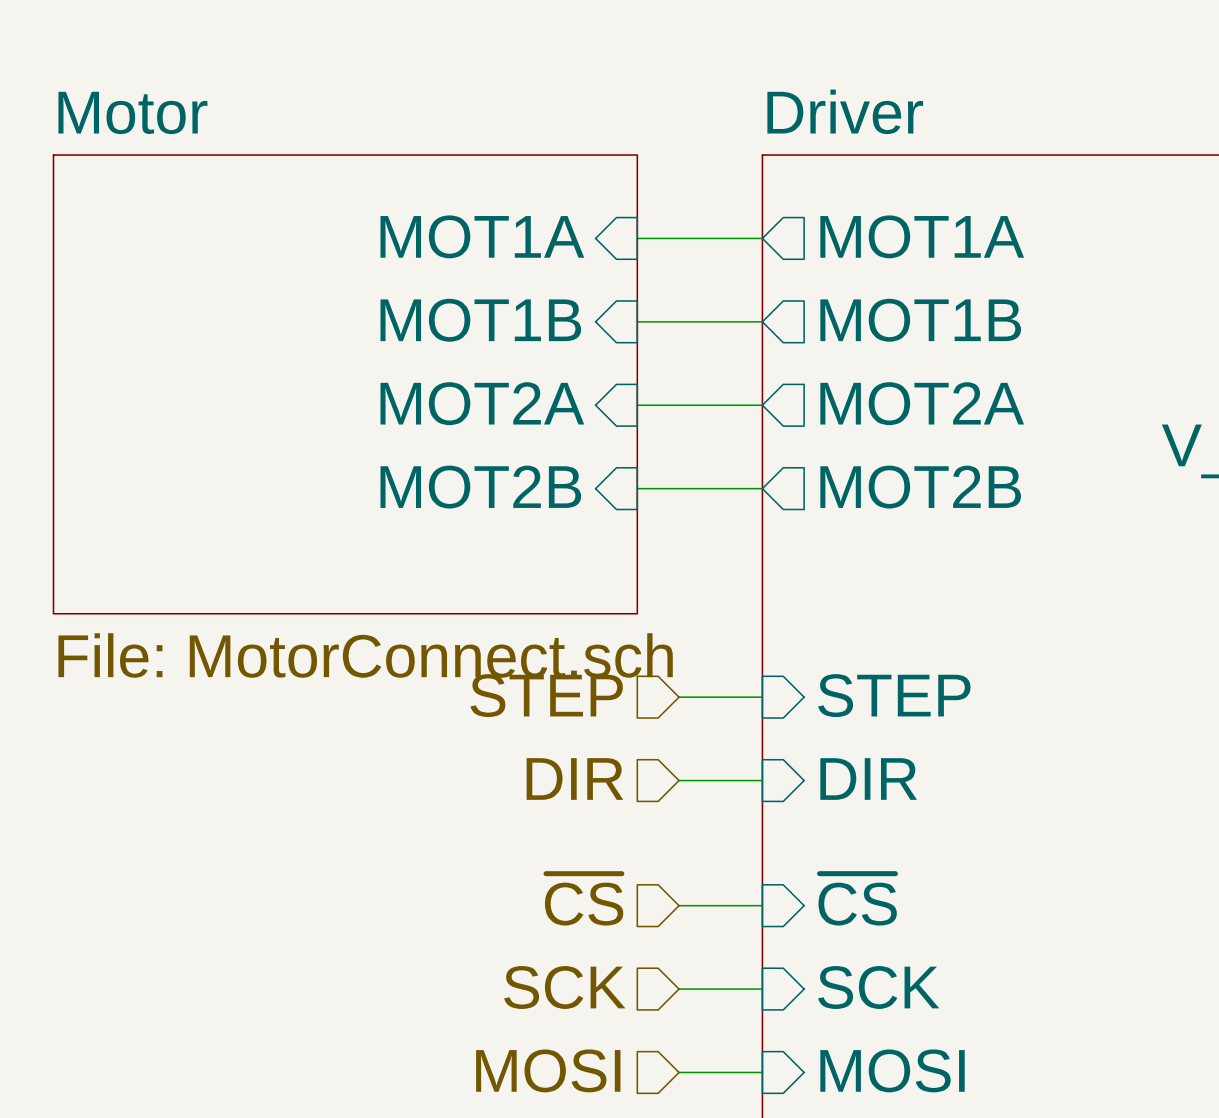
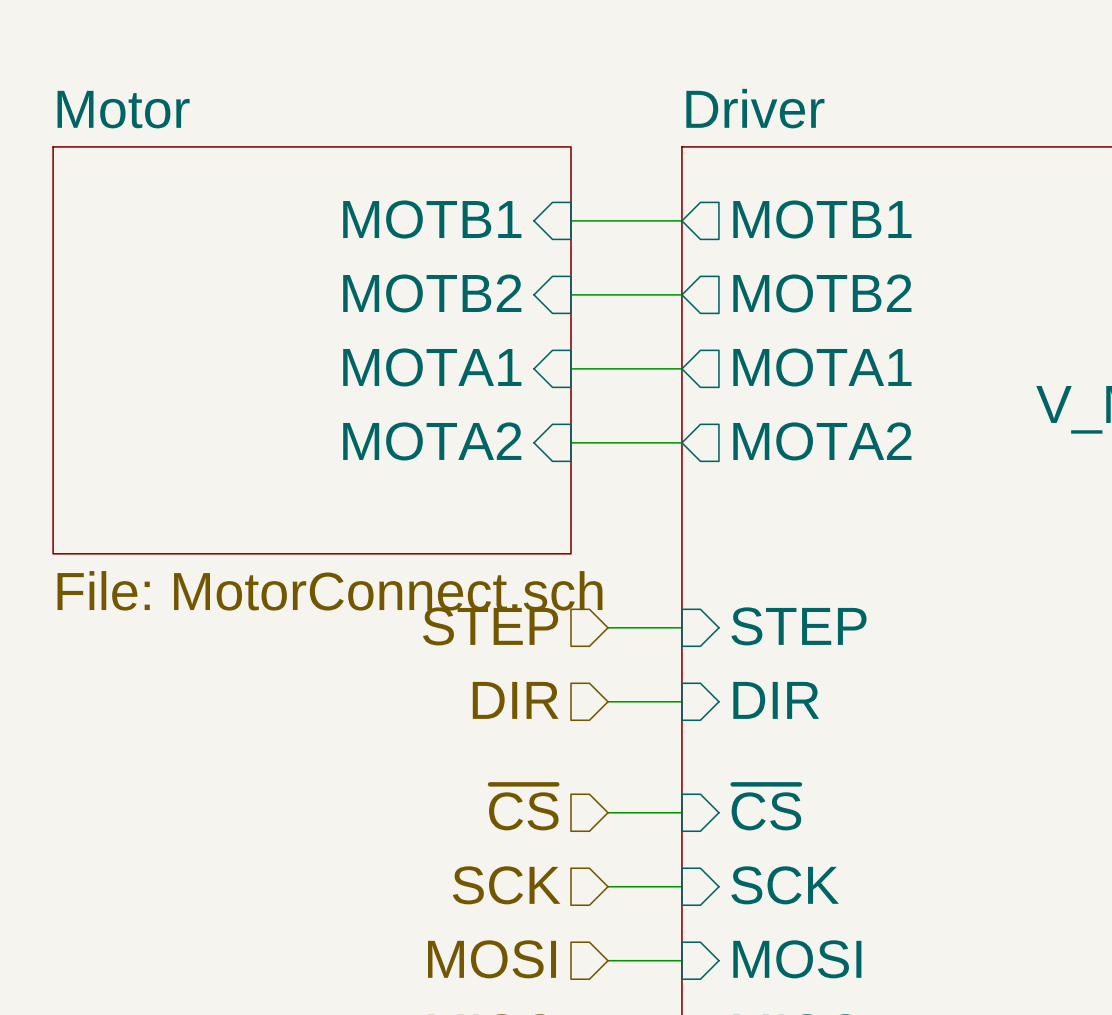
sheet pin: MOT1A (482, 236) -> MOTB1 (432, 219)
sheet pin: MOT1A (922, 236) -> MOTB1 (822, 219)
sheet pin: MOT1B (480, 320) -> MOTB2 (432, 293)
sheet pin: MOT1B (920, 320) -> MOTB2 (822, 293)
sheet pin: MOT2A (482, 403) -> MOTA1 (432, 367)
sheet pin: MOT2A (922, 403) -> MOTA1 (822, 367)
sheet pin: MOT2B (480, 487) -> MOTA2 (432, 441)
sheet pin: MOT2B (920, 487) -> MOTA2 (822, 441)

